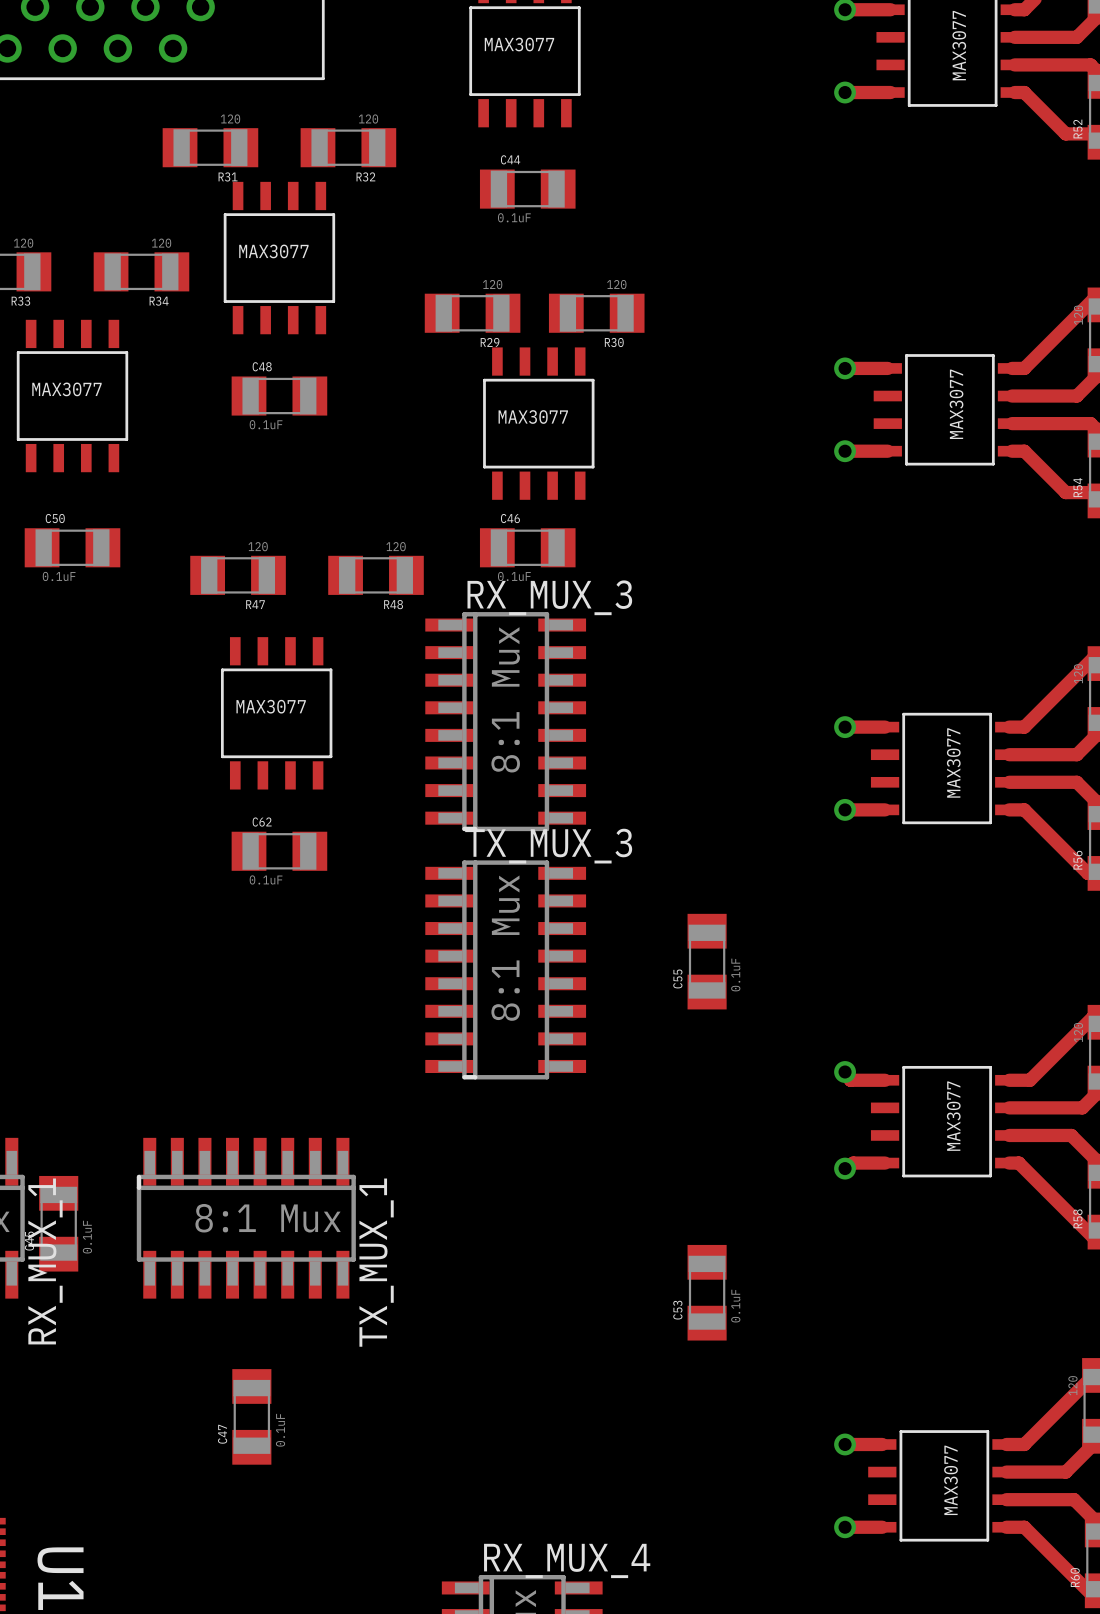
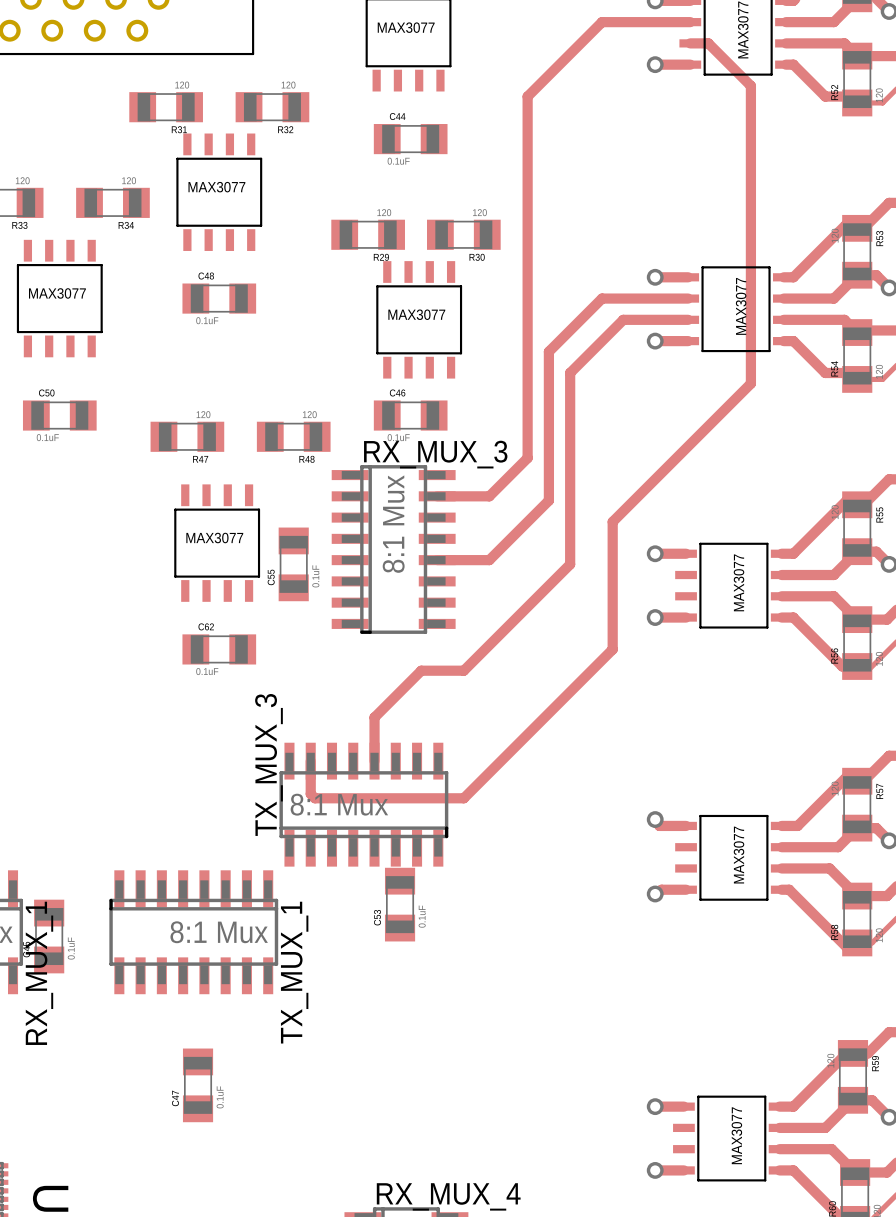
track: none -> (690, 22) (602, 22) (527, 96) (527, 458) (489, 496) (437, 496)
track: none -> (690, 43) (708, 43) (750, 85) (750, 383) (612, 521) (612, 649) (463, 798) (314, 798) (310, 794) (310, 761)
track: none -> (688, 298) (602, 298) (548, 351) (548, 500) (489, 560) (437, 560)
track: none -> (688, 319) (623, 319) (570, 372) (570, 564) (463, 670) (421, 670) (374, 717) (374, 761)
C55 position: (707, 961) -> (293, 564)
TX_MUX_3 rotation: 0° (505, 969) -> 90° counterclockwise (363, 804)
C53 position: (707, 1292) -> (400, 904)

